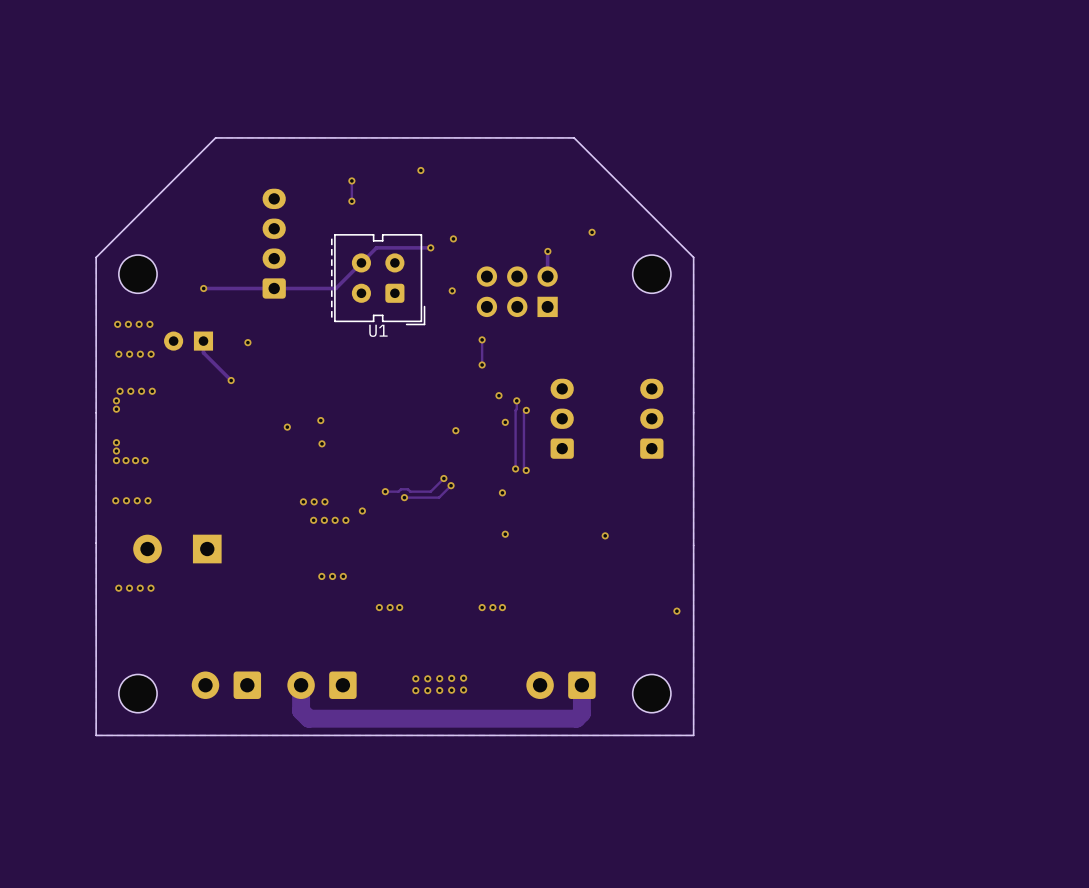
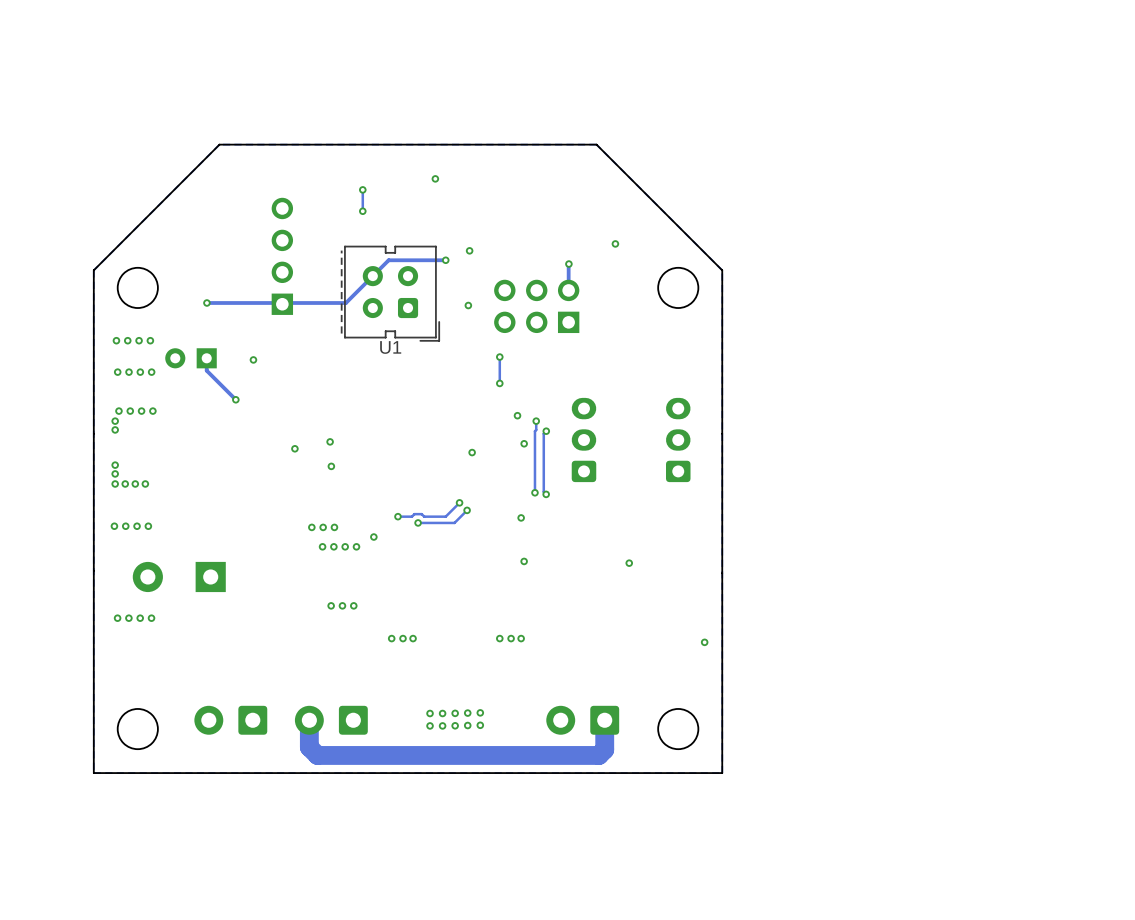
part footprint: [262, 188, 286, 299] -> [271, 197, 294, 315]

